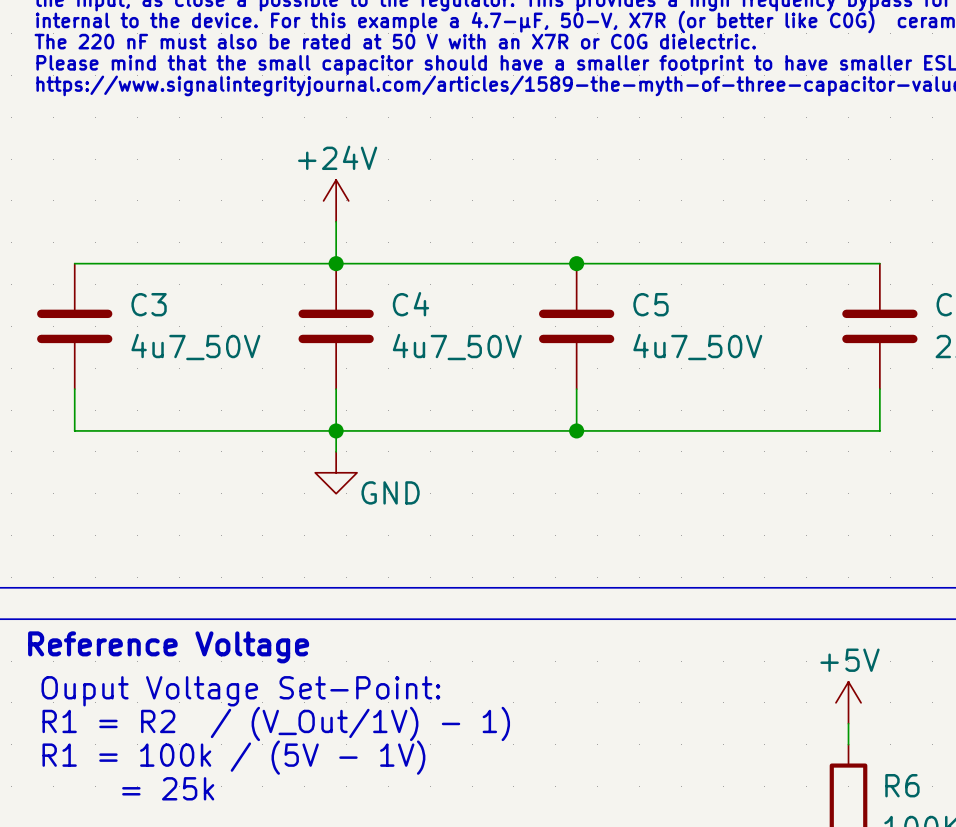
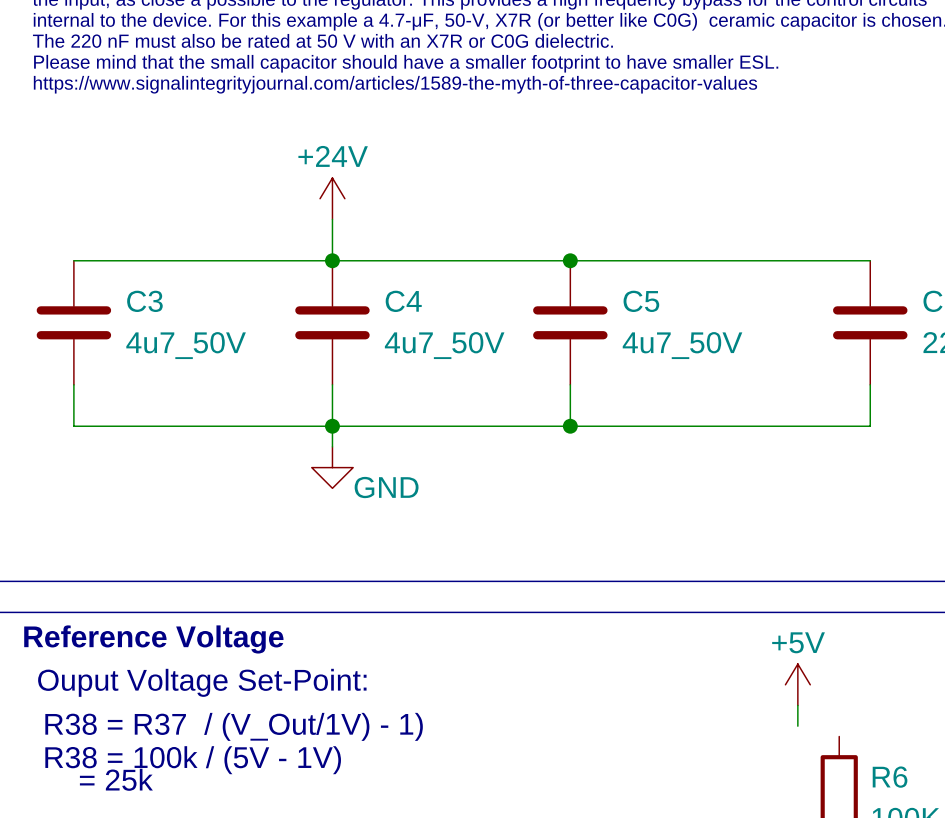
power symbol position: +5V (848, 702) -> +5V (797, 684)
text: R1 = R2 / (V_Out/1V) - 1) (276, 723) -> R38 = R37 / (V_Out/1V) - 1) (234, 726)
wire: (848, 723) (848, 744) -> (797, 705) (797, 726)
text: R1 = 100k / (5V - 1V) (233, 757) -> R38 = 100k / (5V - 1V) (193, 760)

